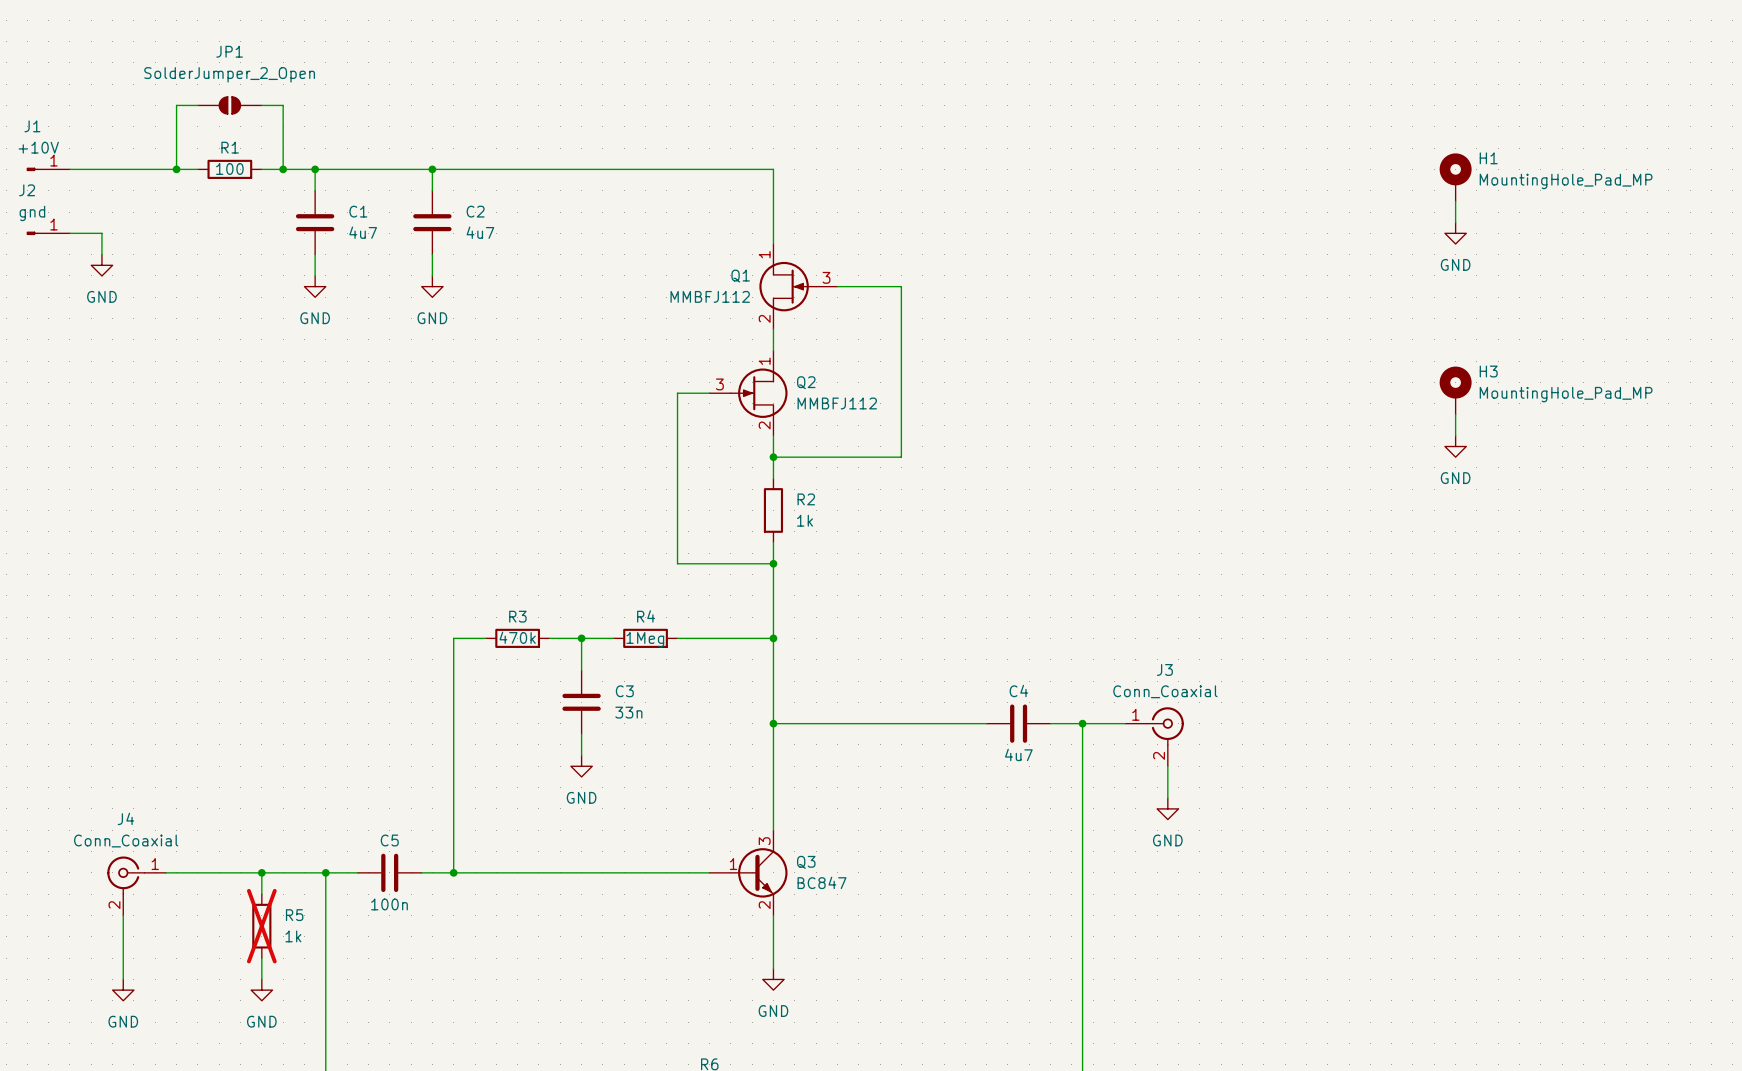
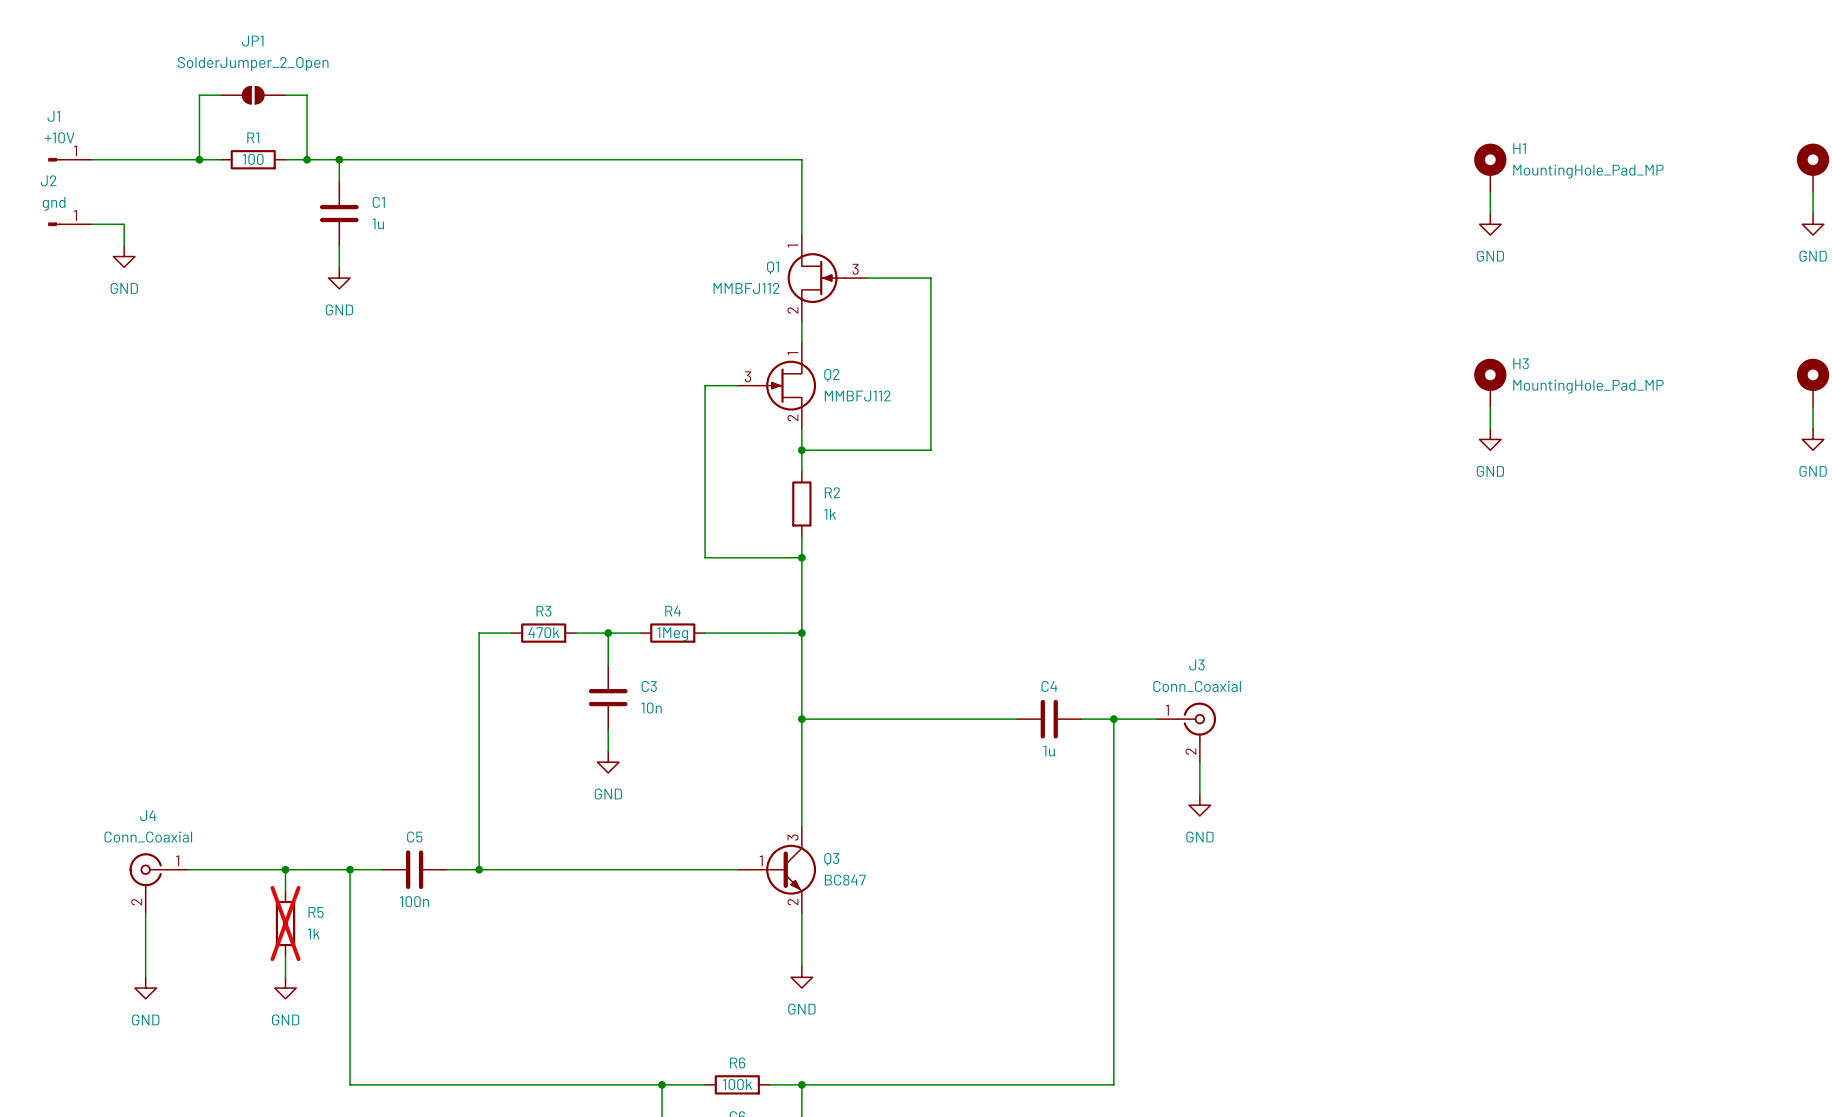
wire: (432, 169) (432, 190) -> none
junction: (432, 169) -> none
C2: 4u7 (432, 222) -> none
C1 value: 4u7 (363, 232) -> 1u (378, 223)
wire: (432, 254) (432, 275) -> none
power symbol: GND (432, 286) -> none
C3 value: 33n (628, 712) -> 10n (651, 707)
C4 value: 4u7 (1018, 754) -> 1u (1049, 751)

